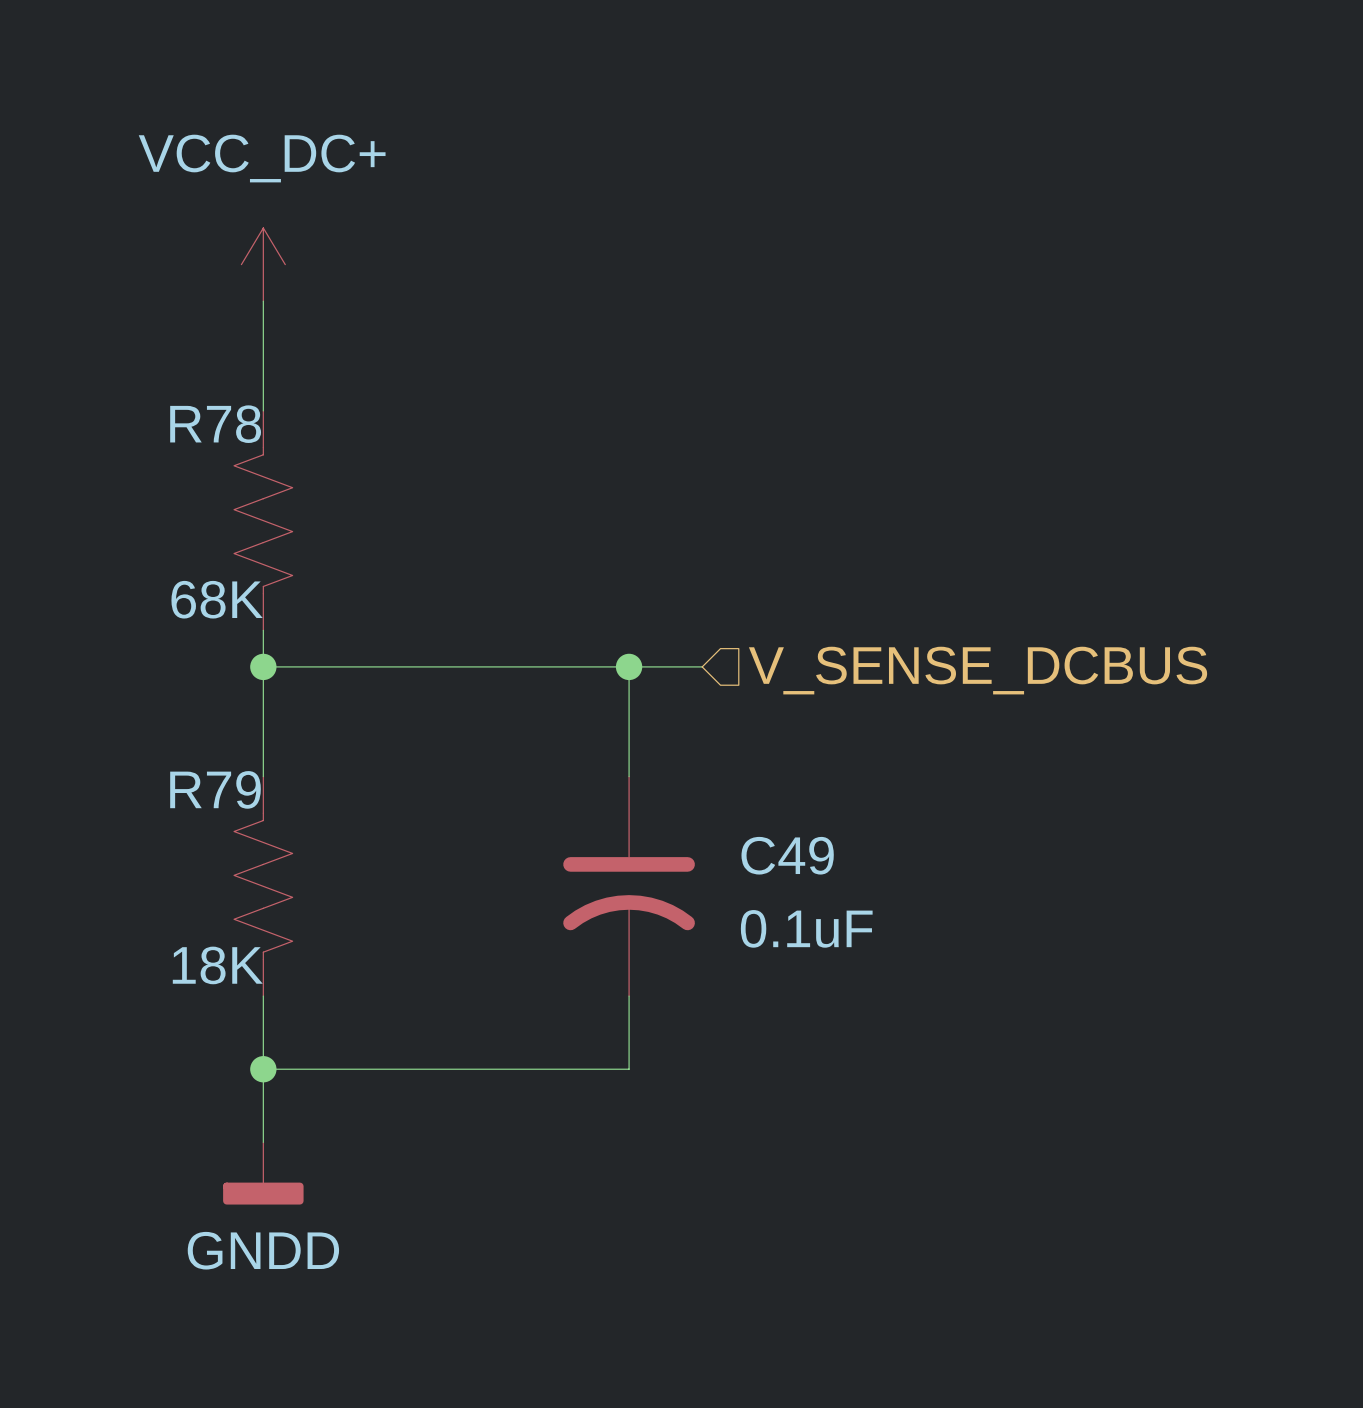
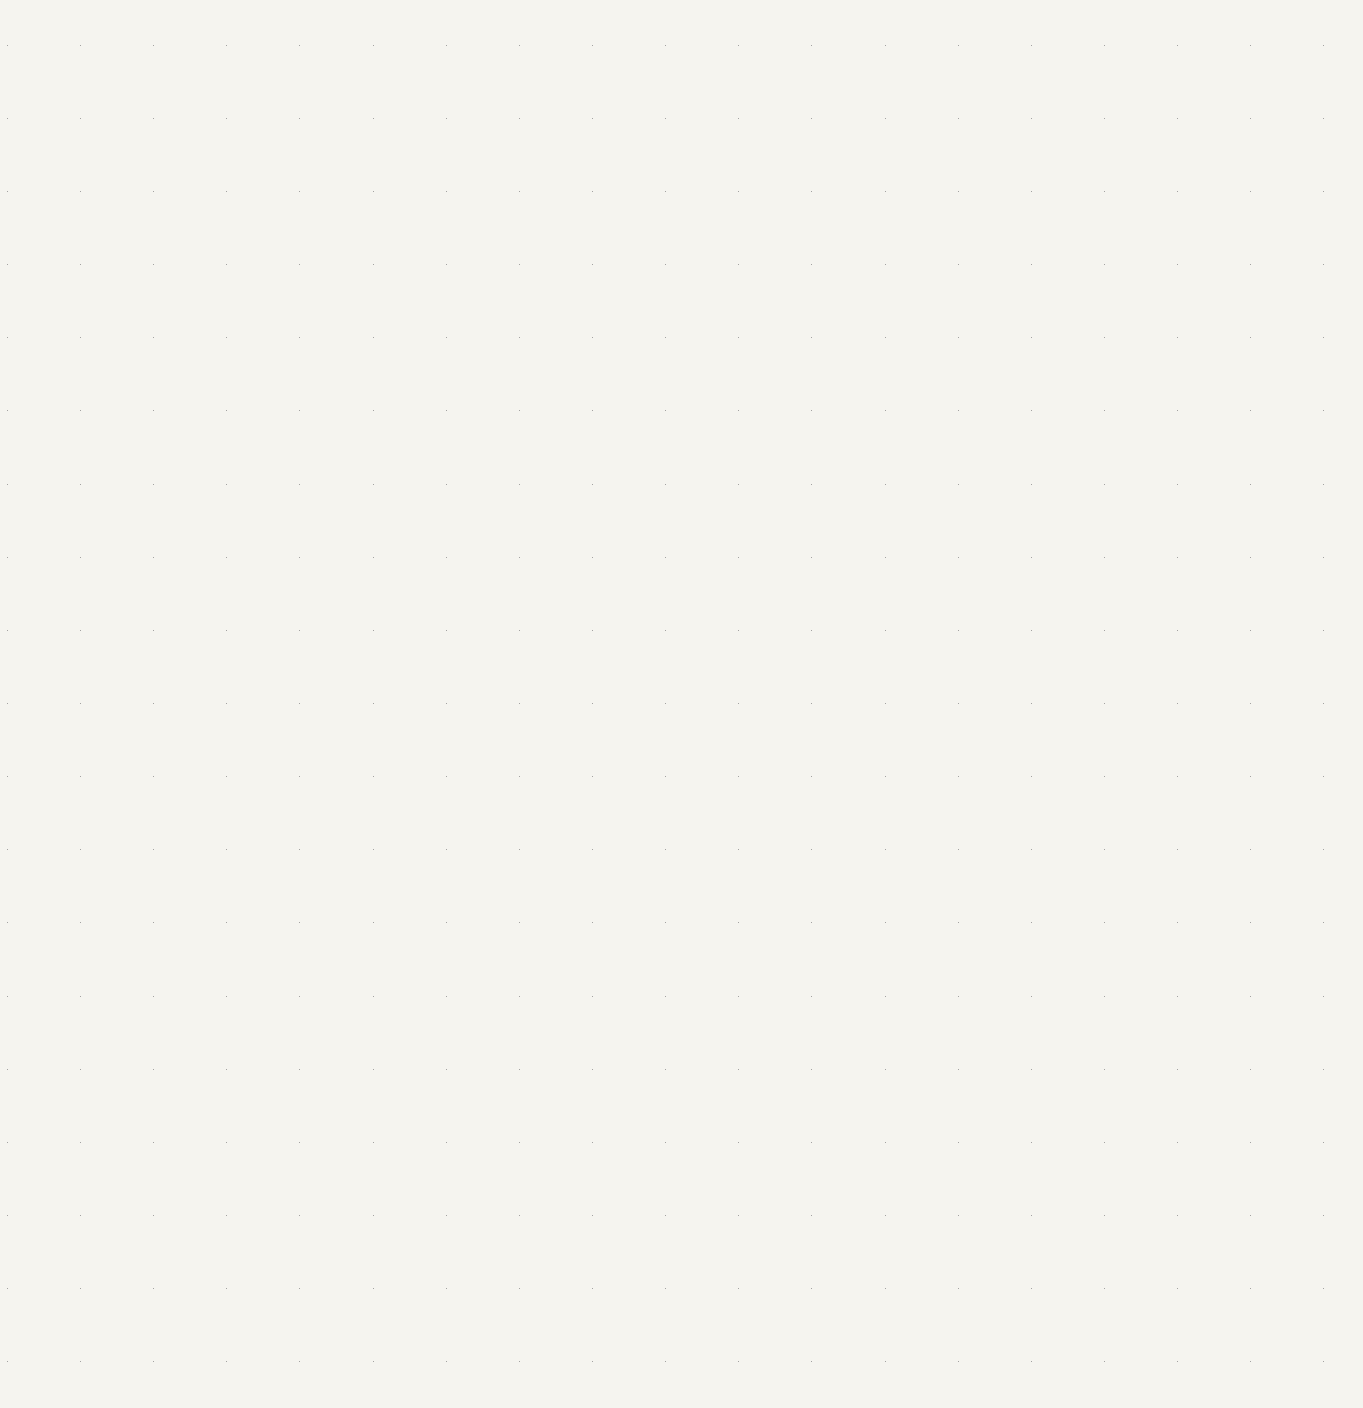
power symbol: VCC_DC+ (263, 264) -> none
wire: (263, 301) (263, 410) -> none
R78: 68K (263, 520) -> none
wire: (263, 630) (263, 776) -> none
wire: (263, 666) (702, 666) -> none
junction: (263, 666) -> none
wire: (629, 666) (629, 776) -> none
junction: (629, 666) -> none
hierarchical label: V_SENSE_DCBUS (978, 670) -> none
R79: 18K (263, 886) -> none
C49: 0.1uF (629, 886) -> none
wire: (263, 996) (263, 1142) -> none
wire: (629, 996) (629, 1069) (263, 1069) -> none
junction: (263, 1069) -> none
power symbol: GNDD (263, 1173) -> none

